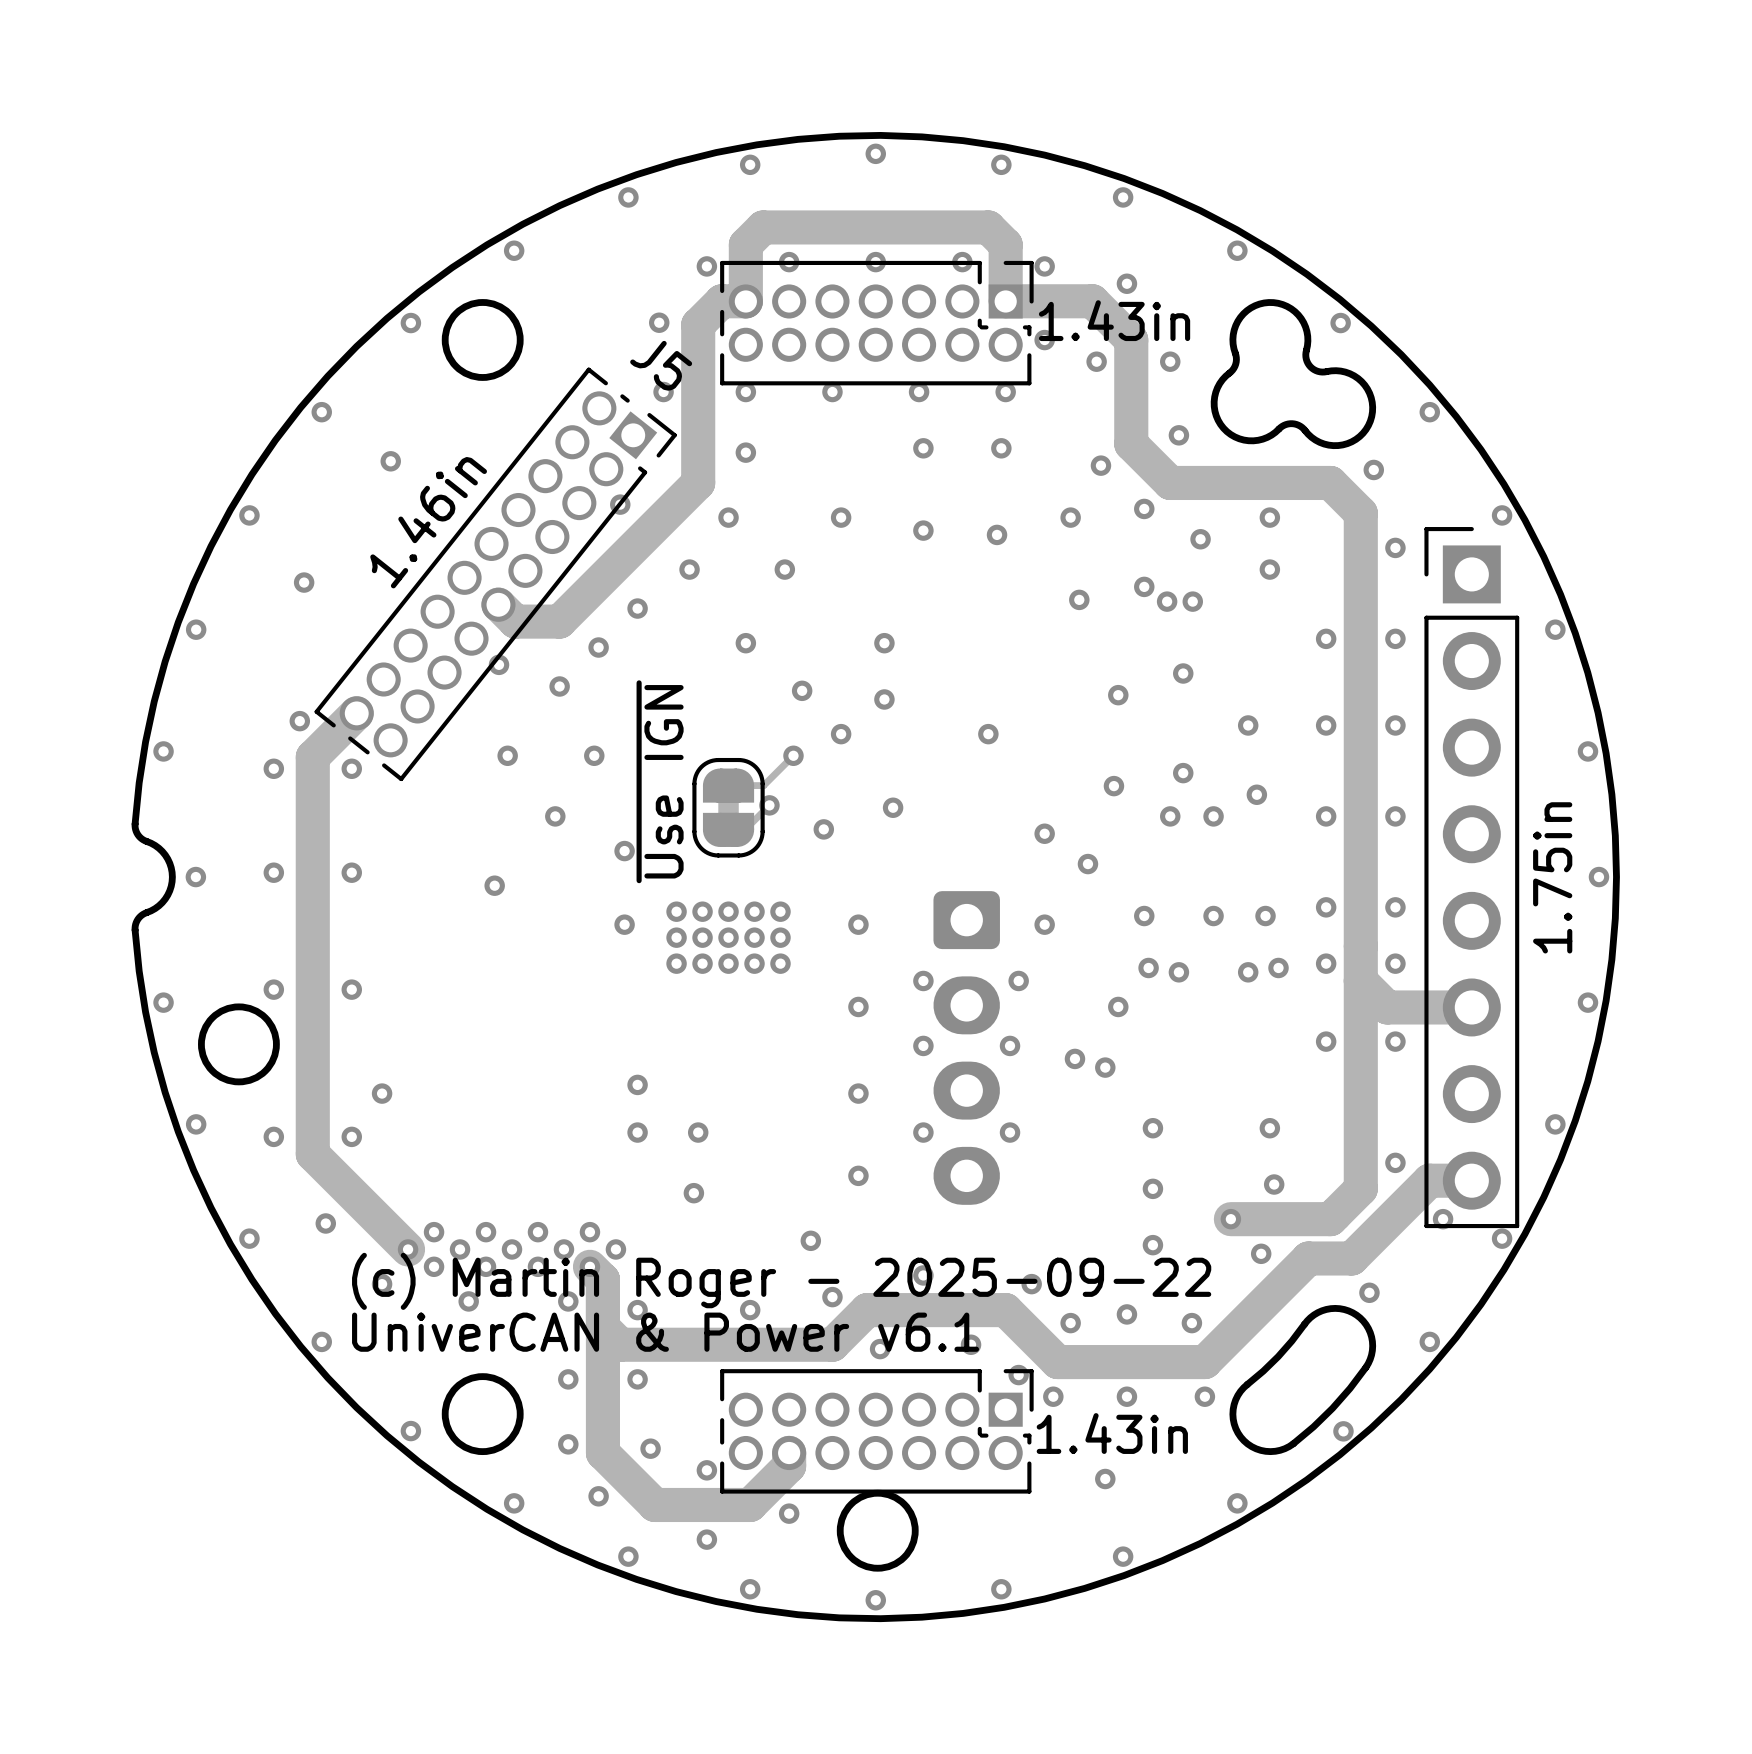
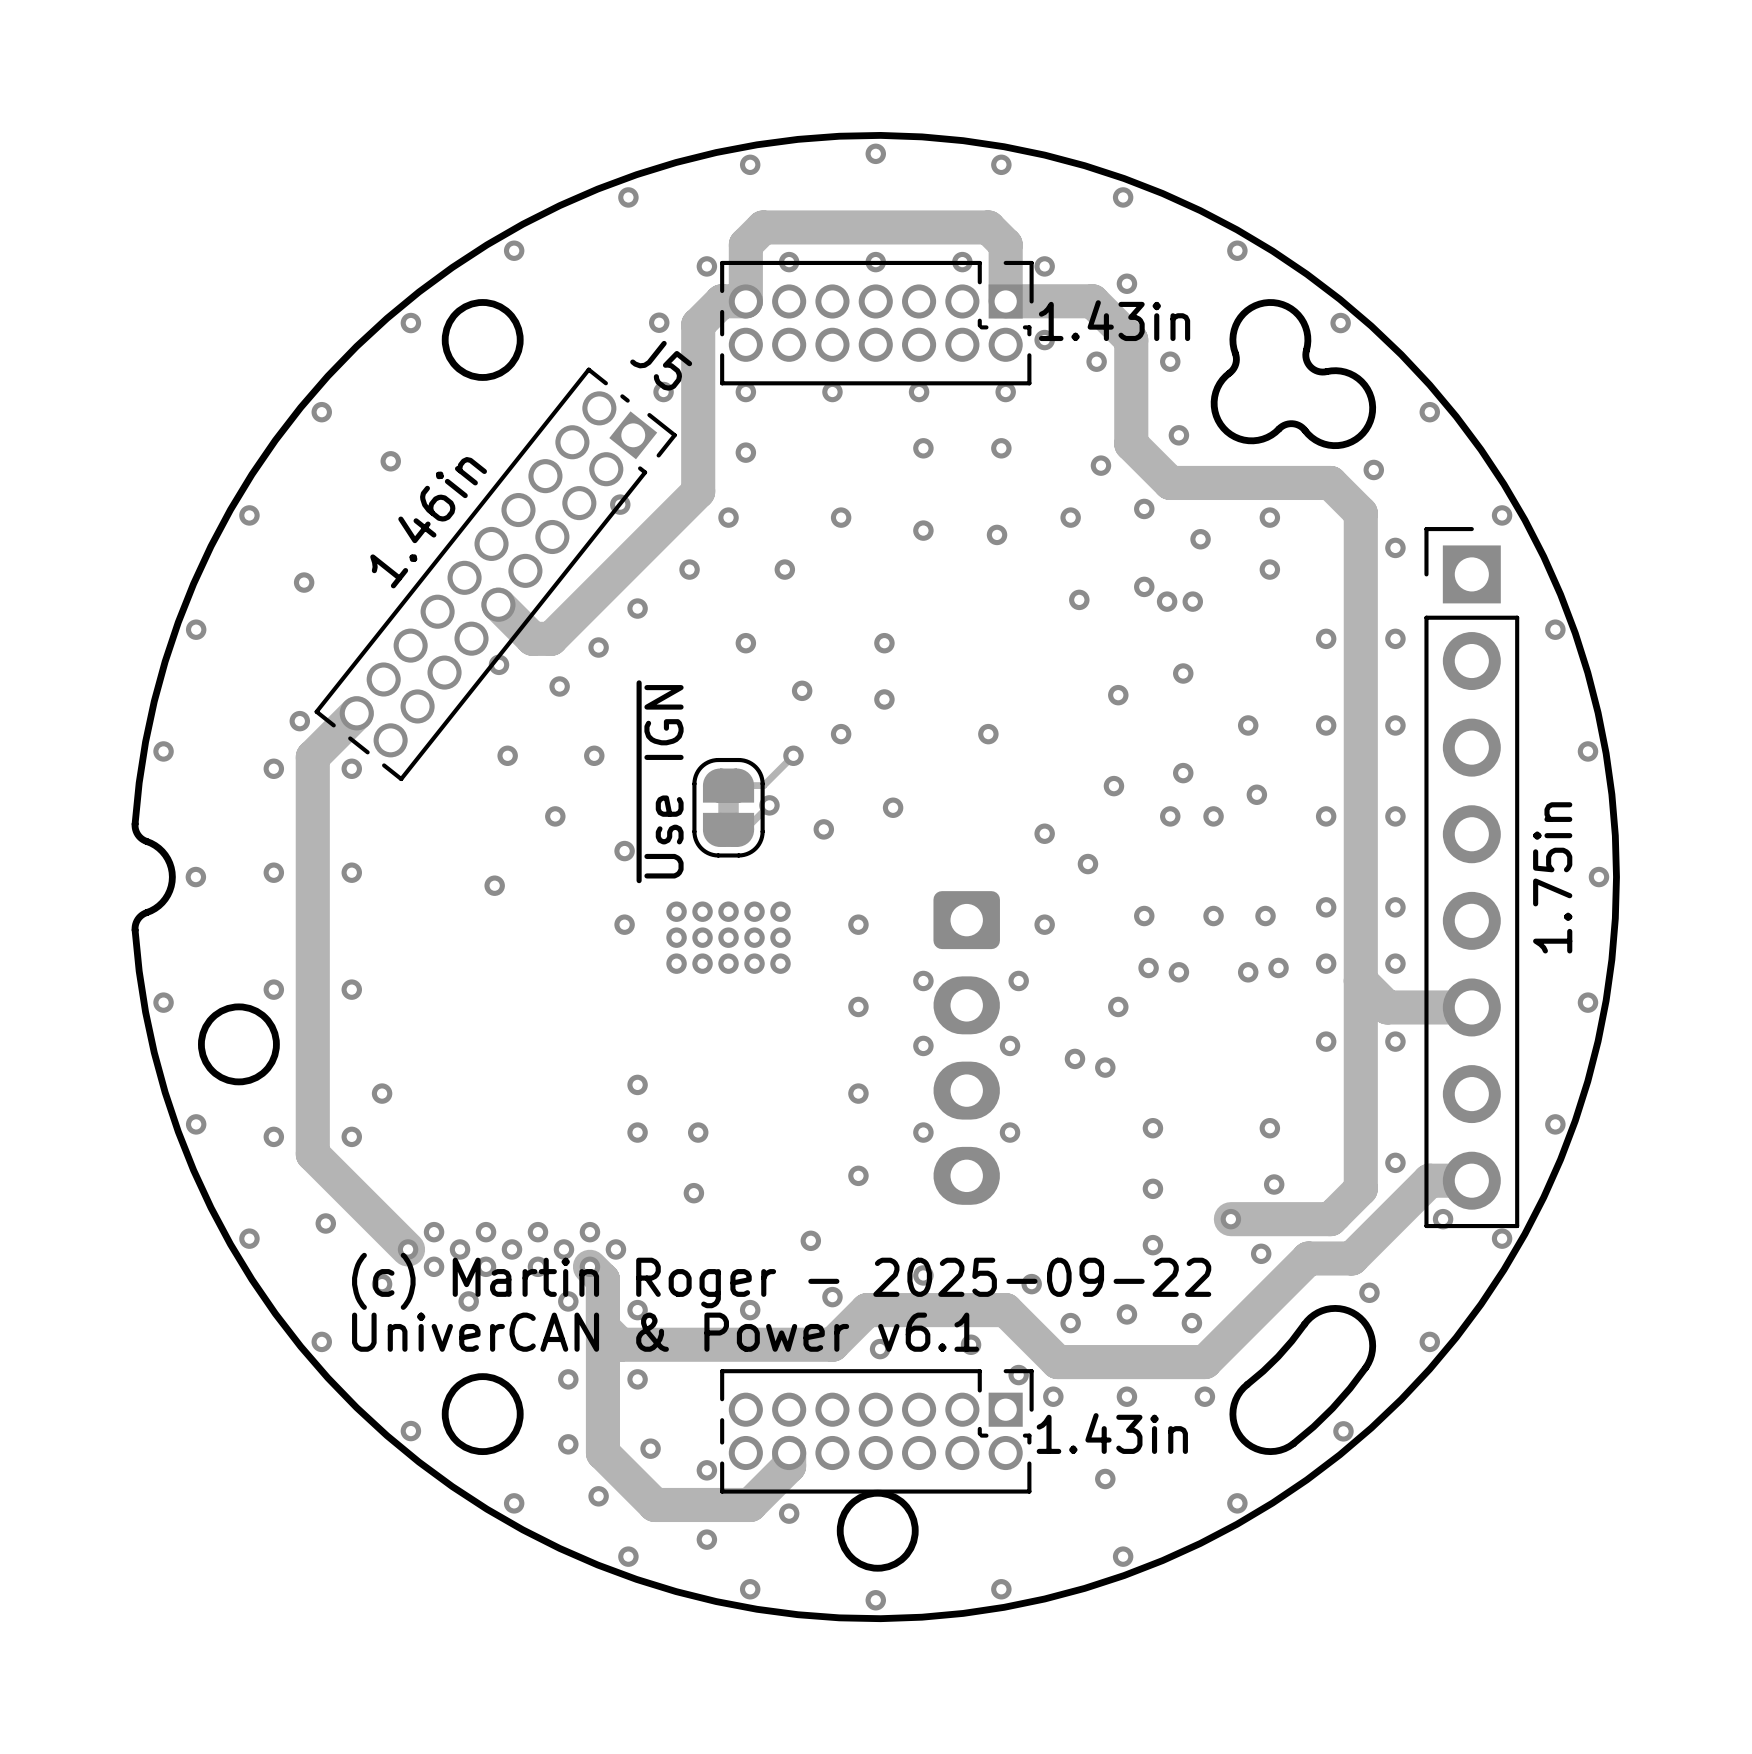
track: (698, 482) (559, 621) (515, 621) -> (698, 482) (698, 491) (550, 638) (532, 638) (515, 621)

